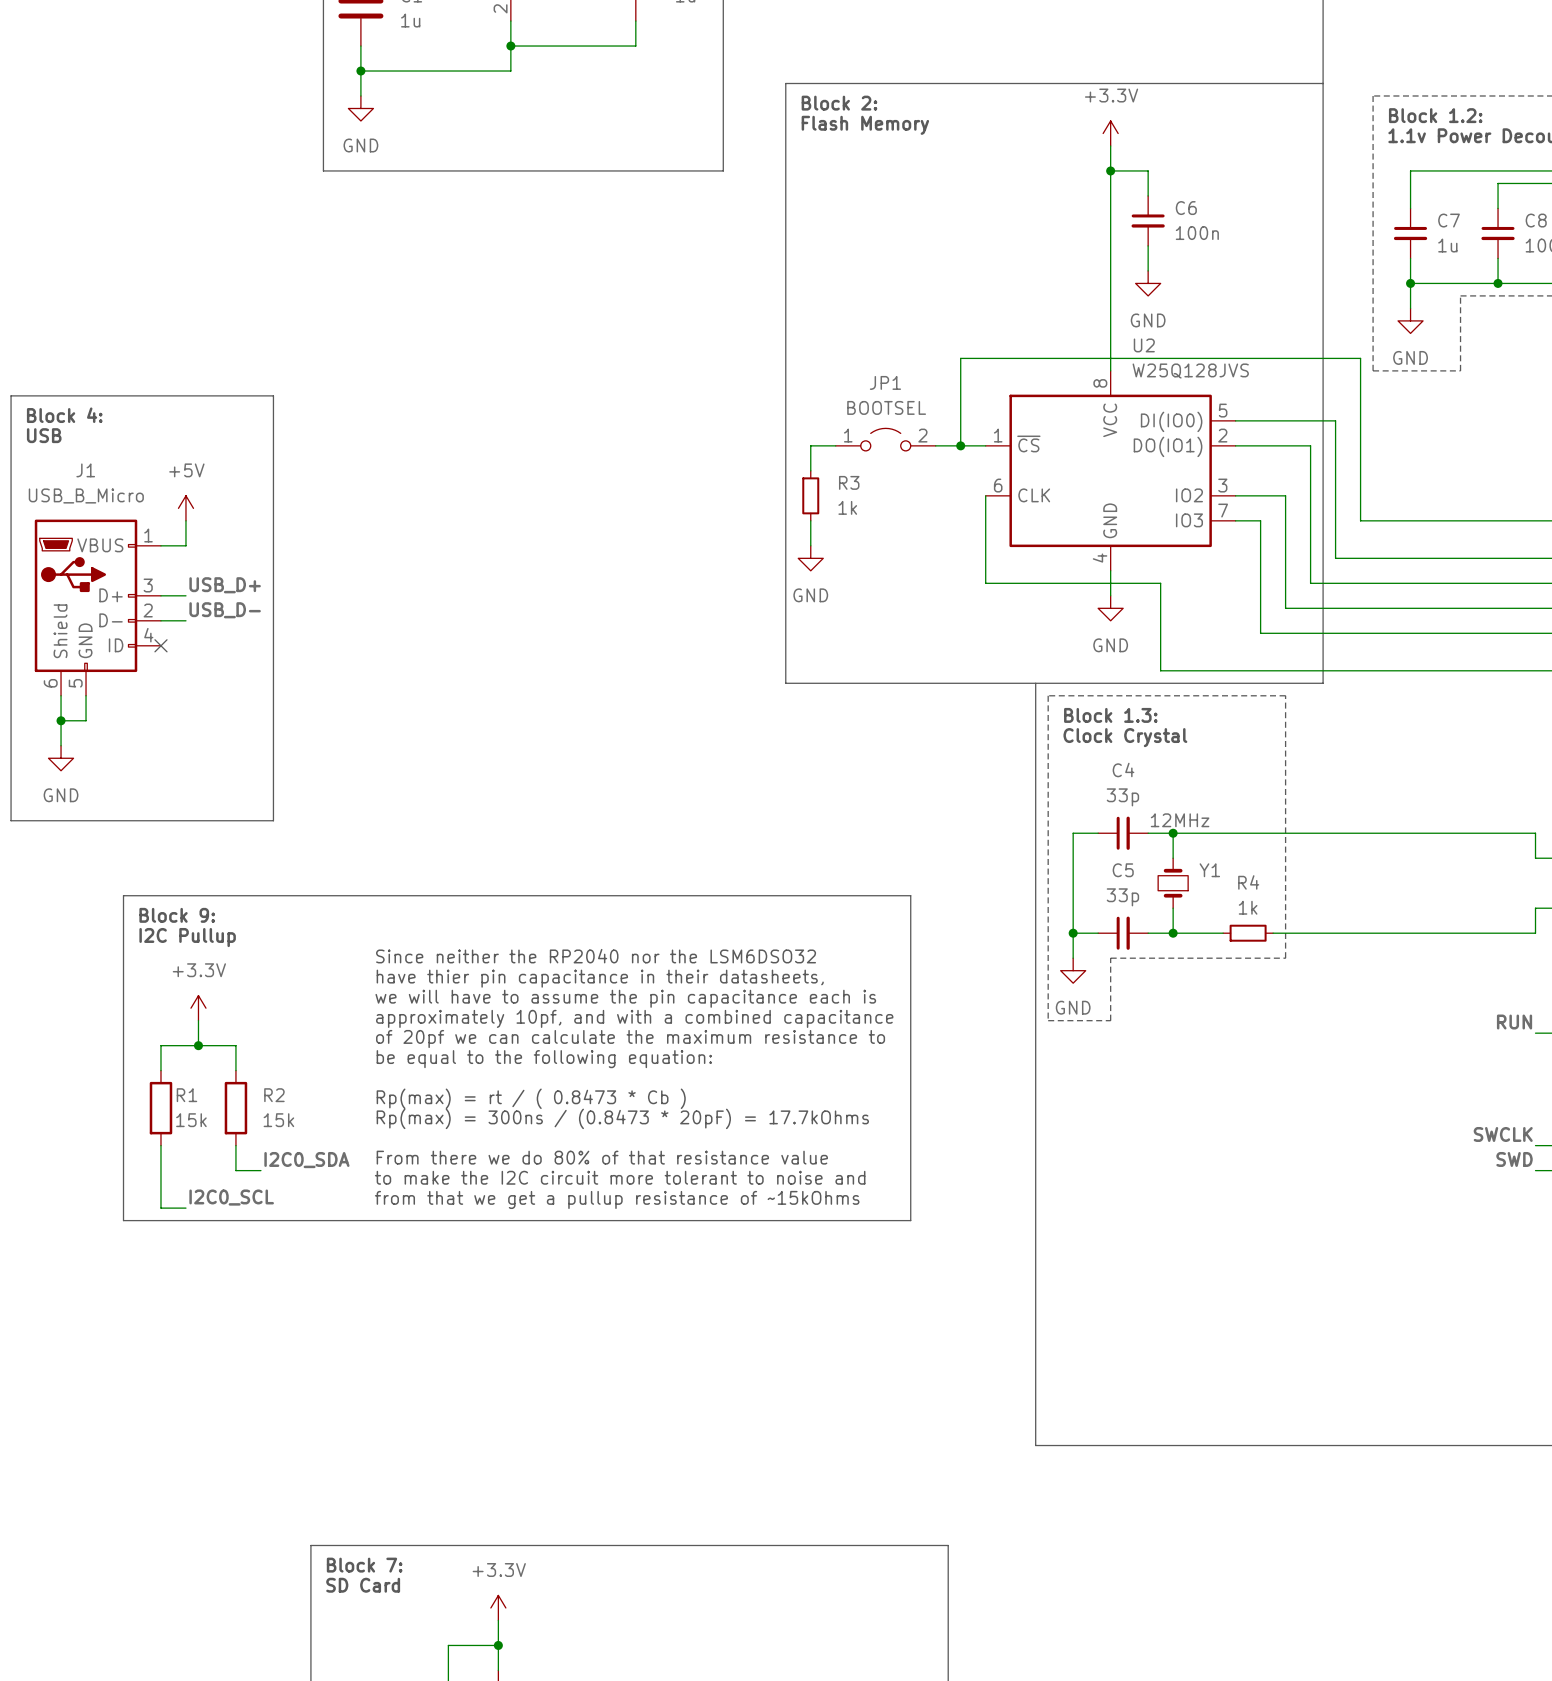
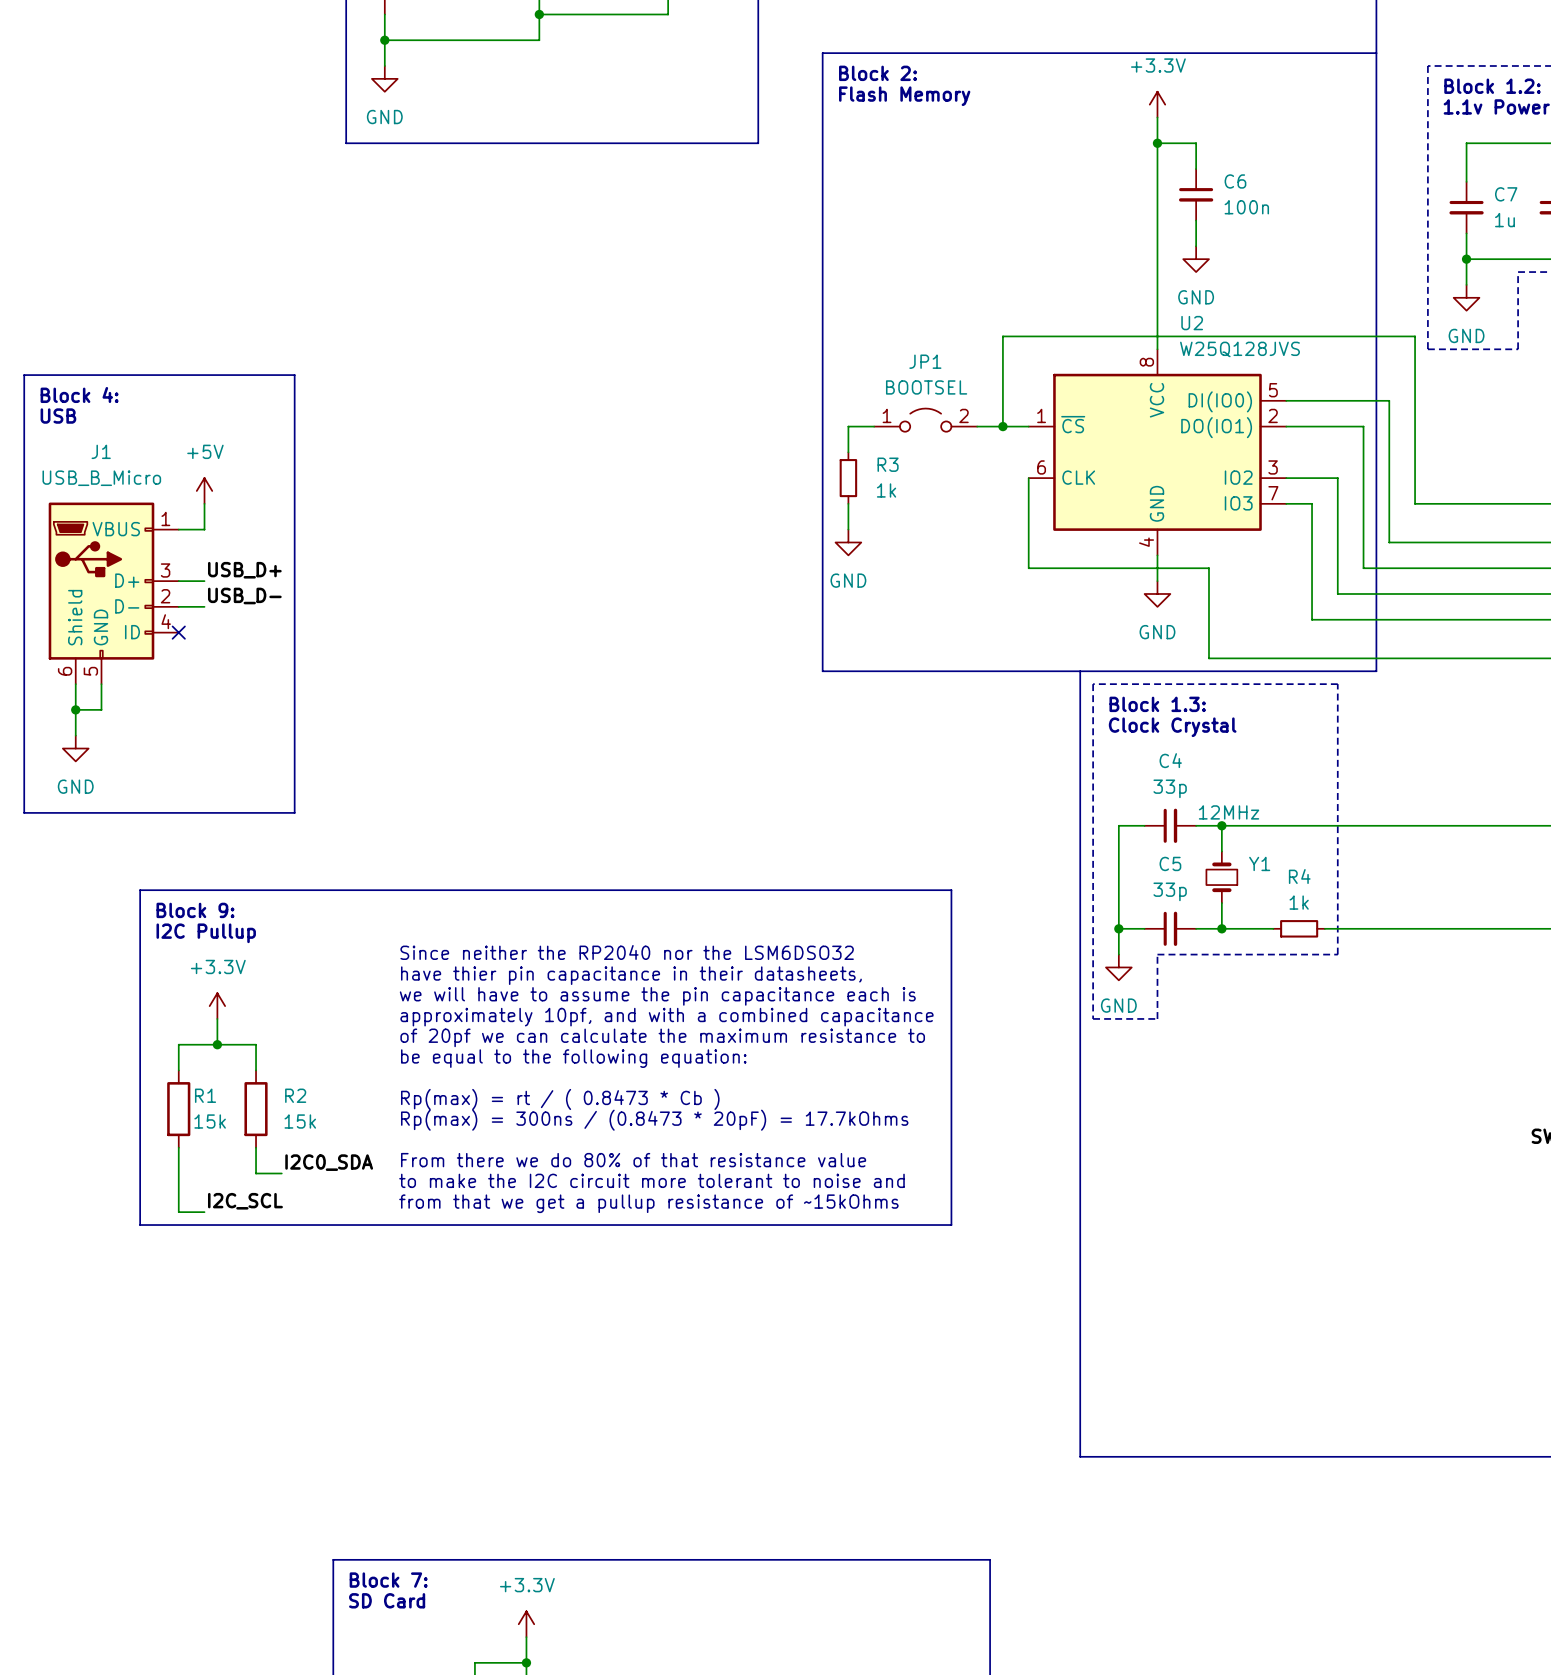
label: I2C0_SCL (231, 1197) -> I2C_SCL (245, 1201)

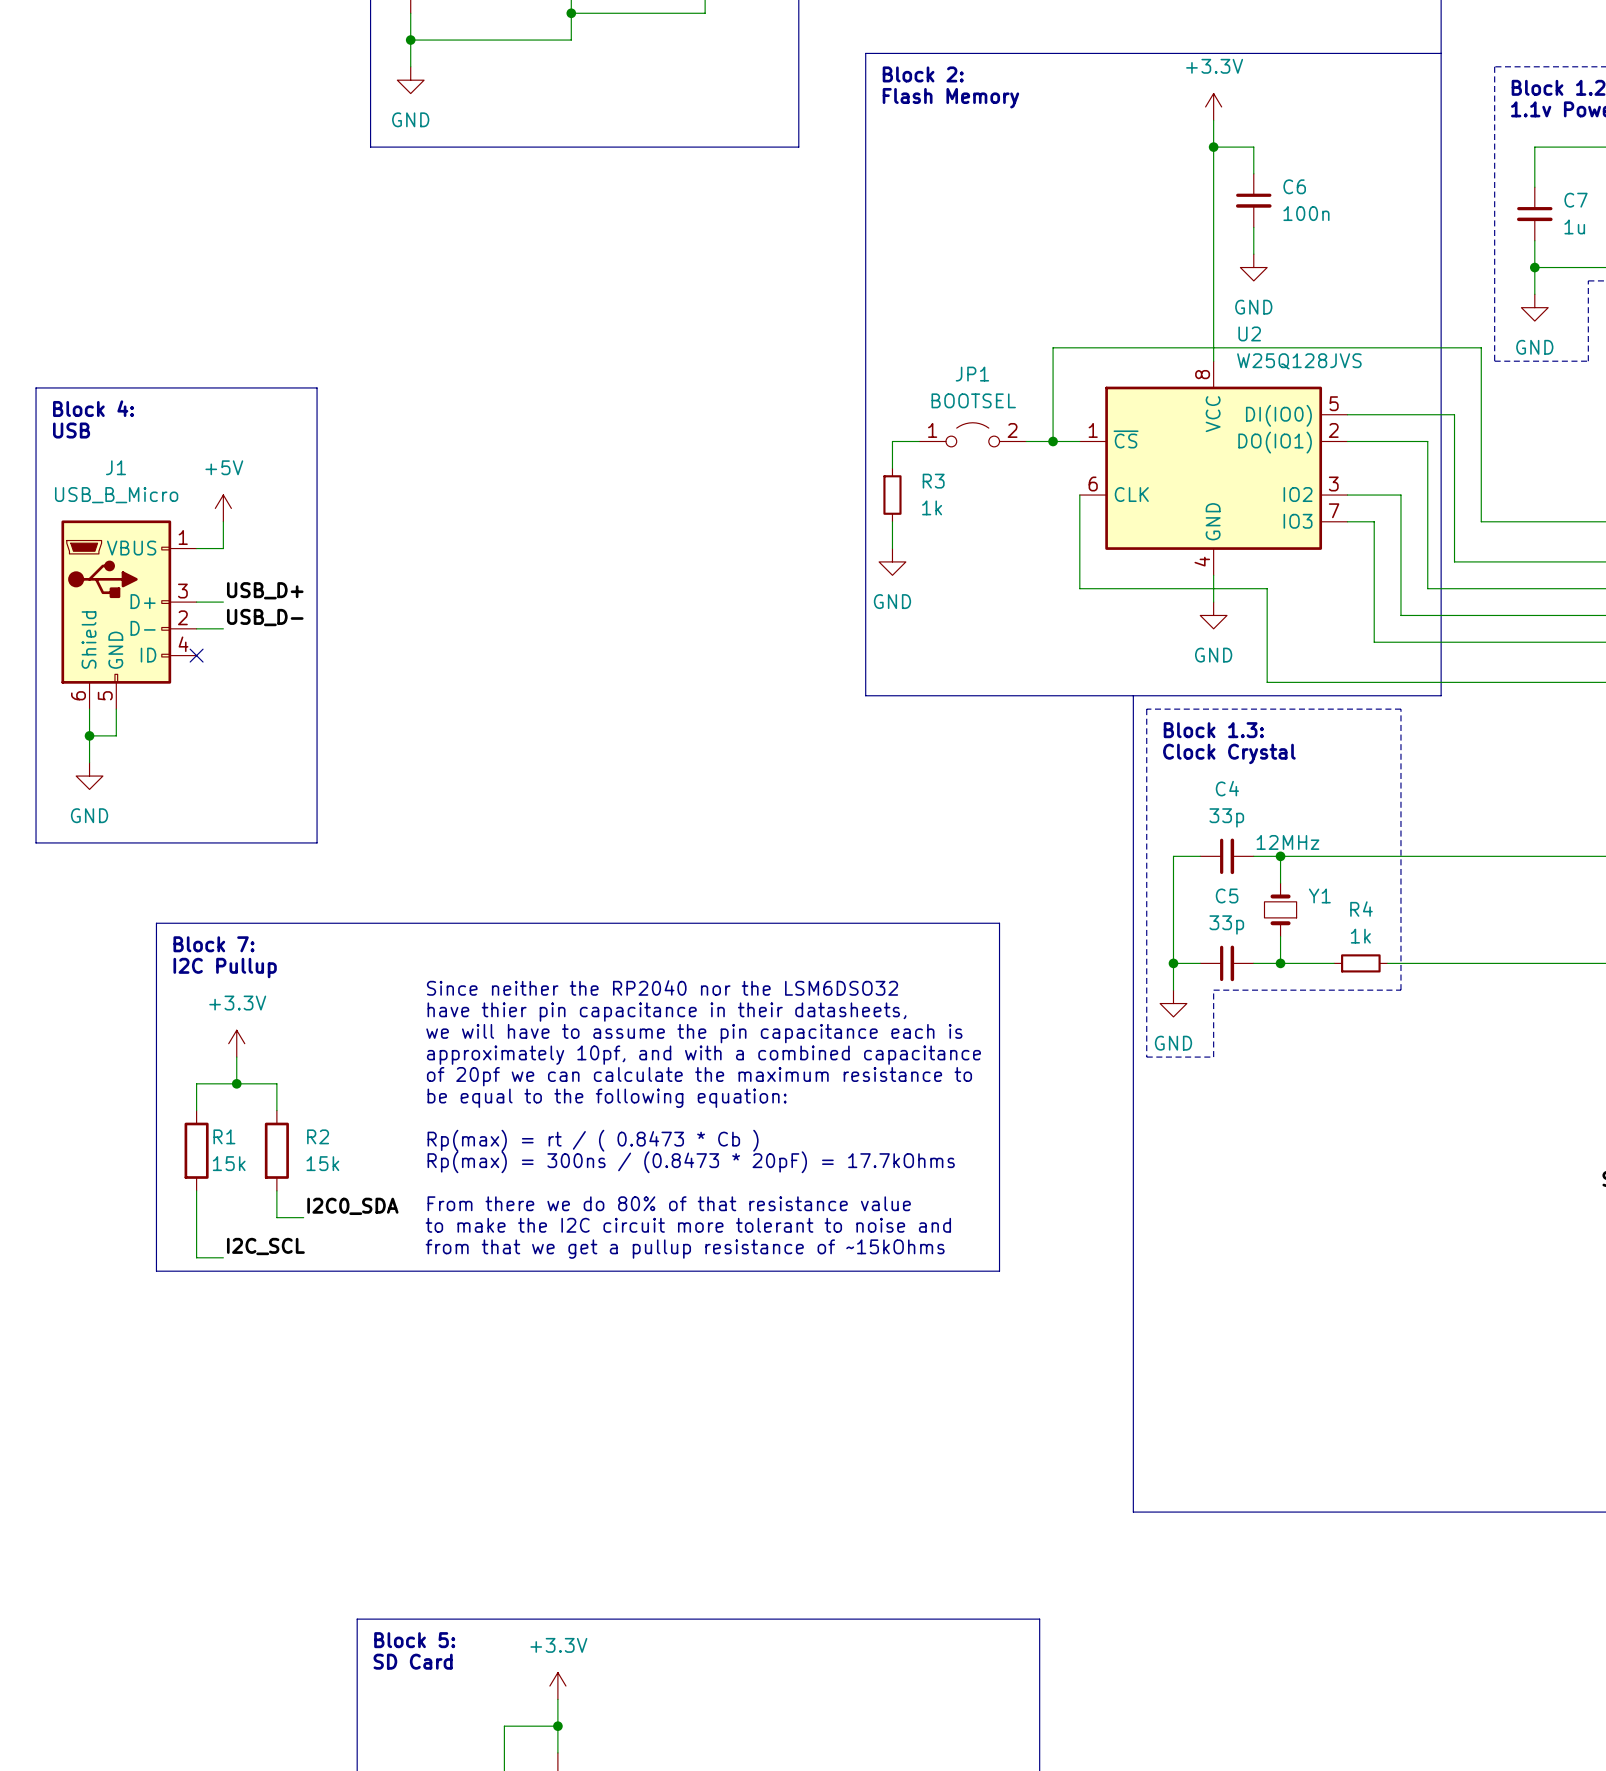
text: Block 9: (195, 910) -> Block 7: (213, 944)
text: Block 7: (388, 1580) -> Block 5: (414, 1640)

